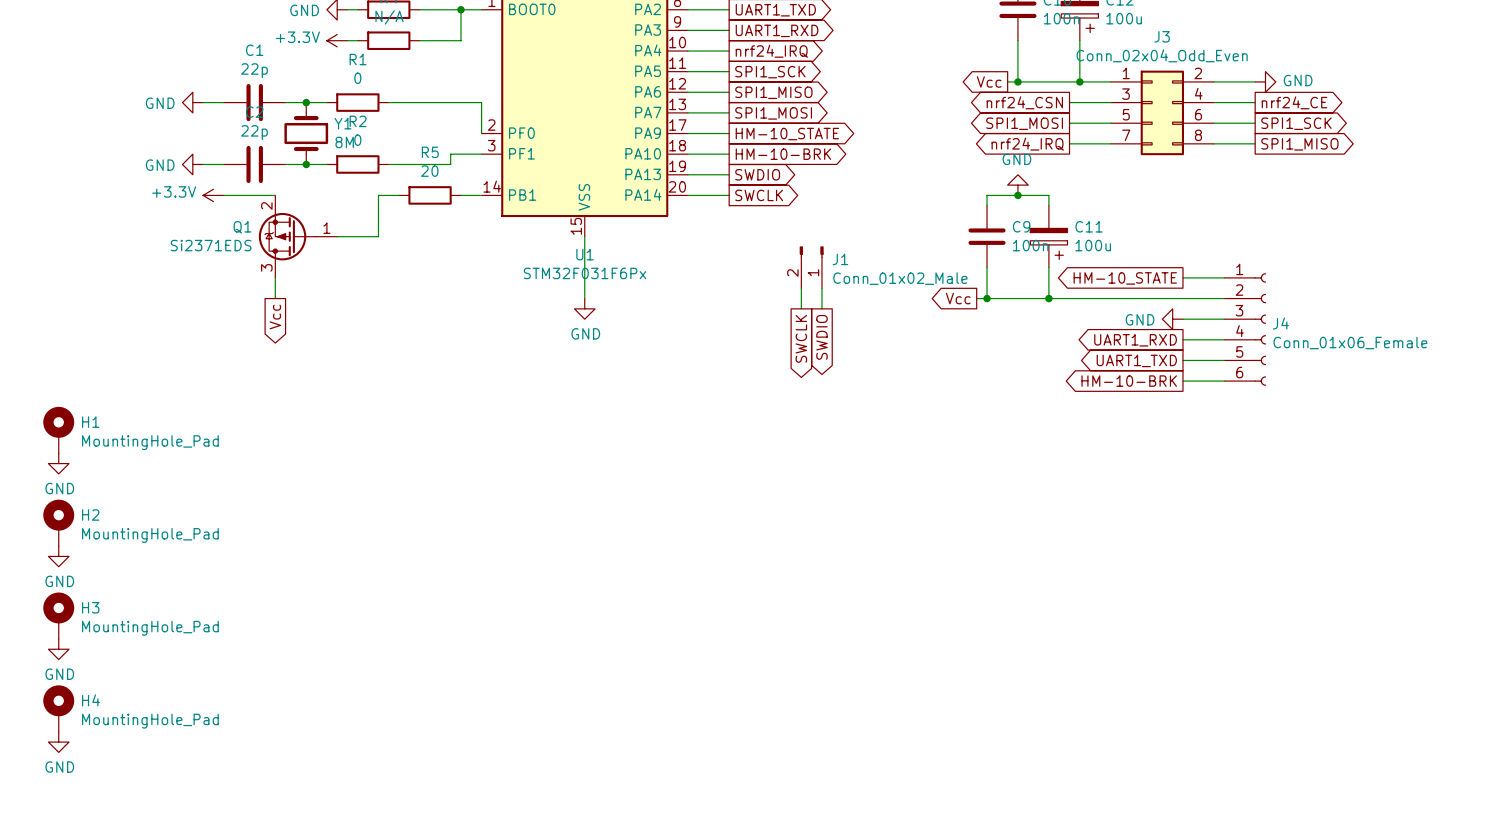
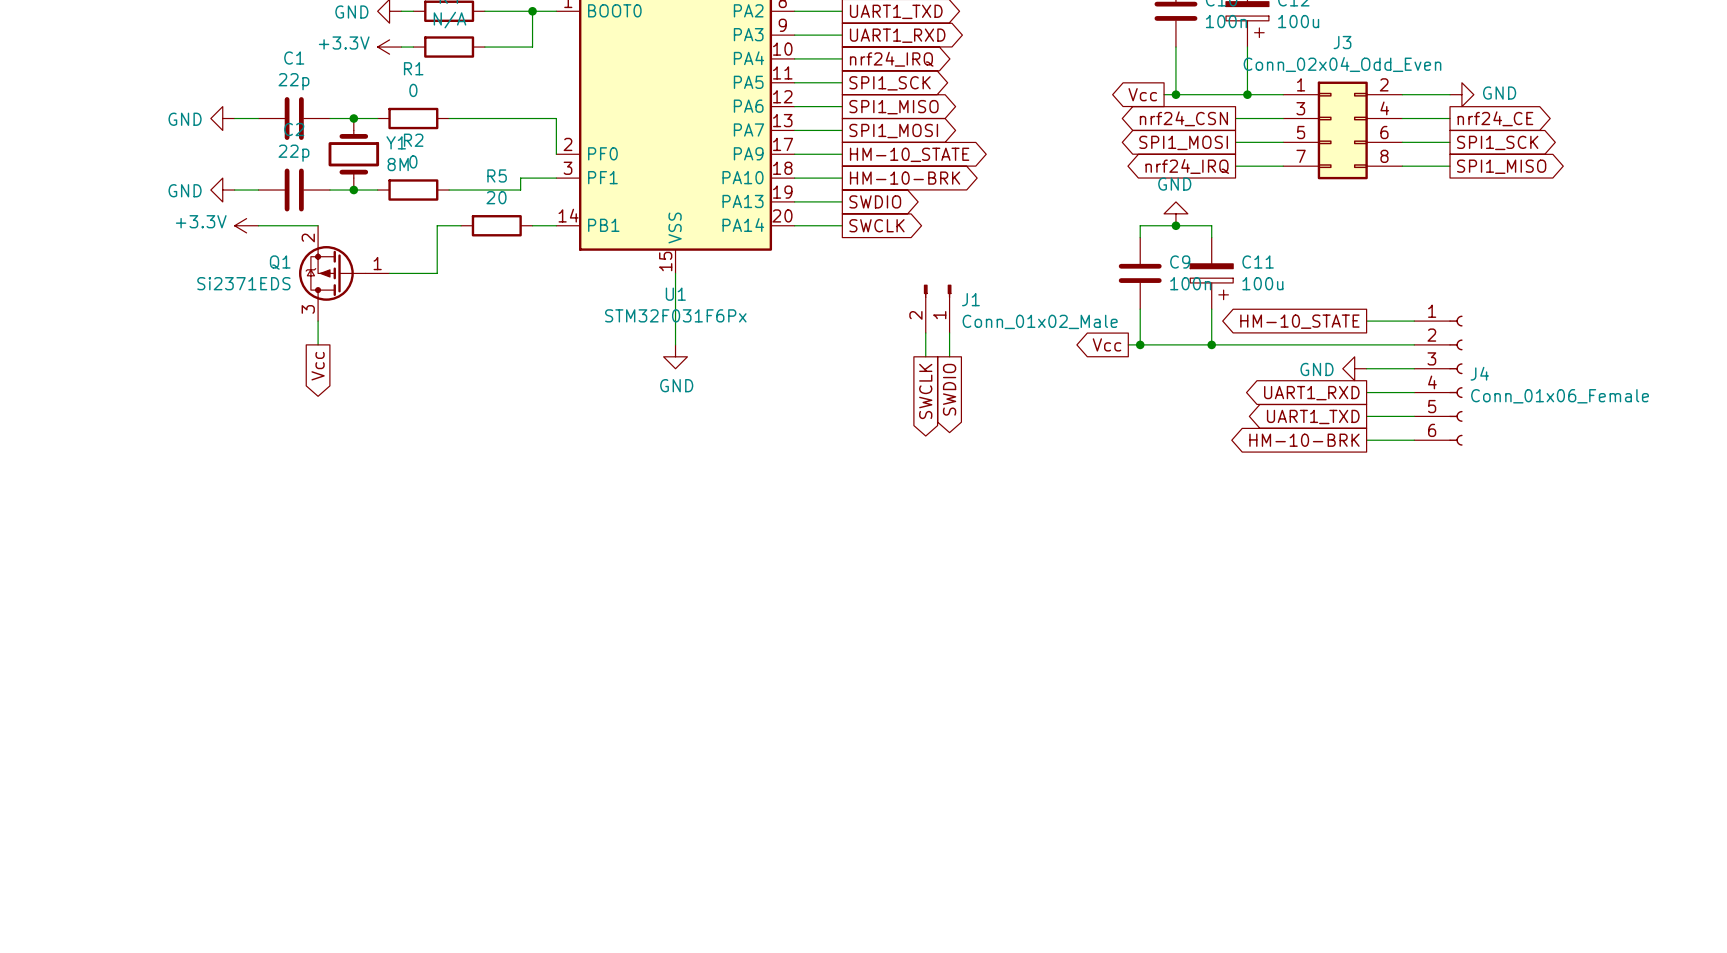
H1: MountingHole_Pad (58, 430) -> none
power symbol: GND (58, 463) -> none
H2: MountingHole_Pad (58, 522) -> none
power symbol: GND (58, 556) -> none
H3: MountingHole_Pad (58, 615) -> none
power symbol: GND (58, 649) -> none
H4: MountingHole_Pad (58, 708) -> none
power symbol: GND (58, 742) -> none

